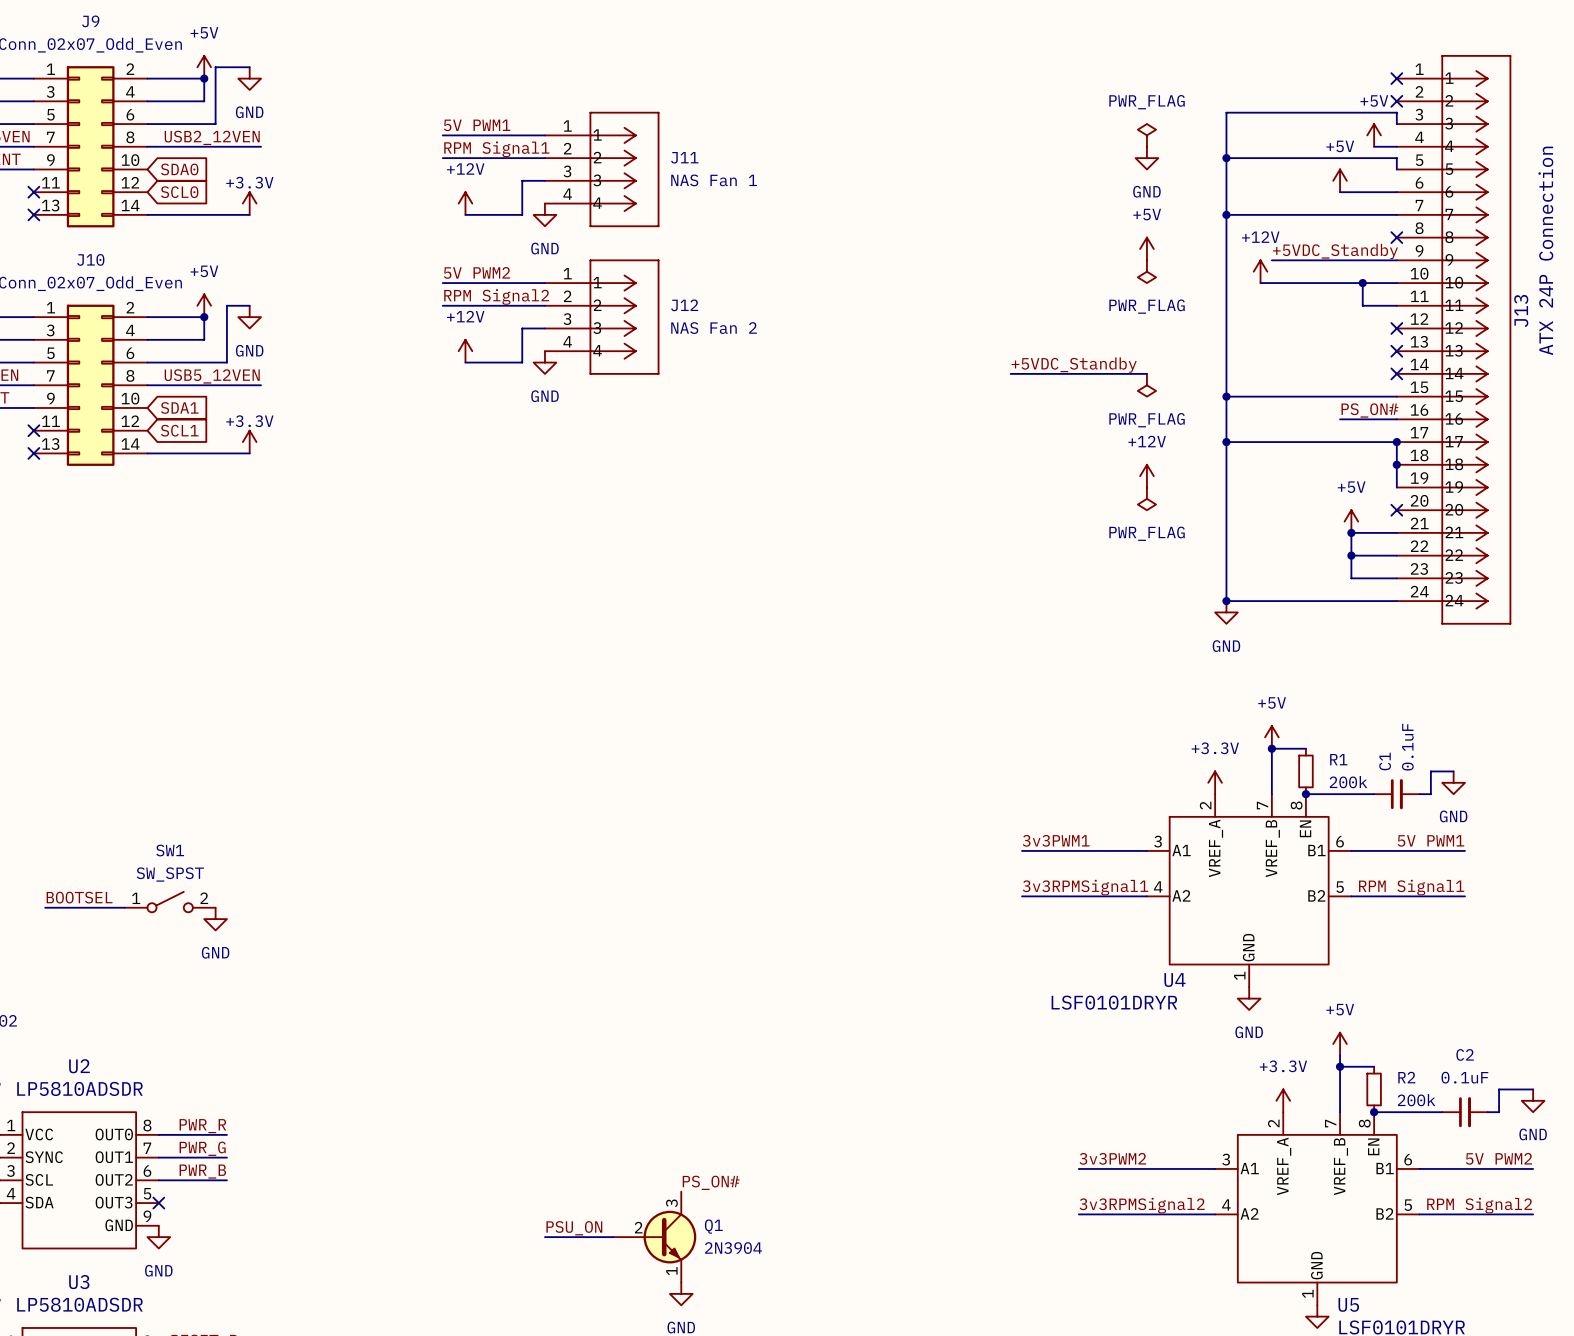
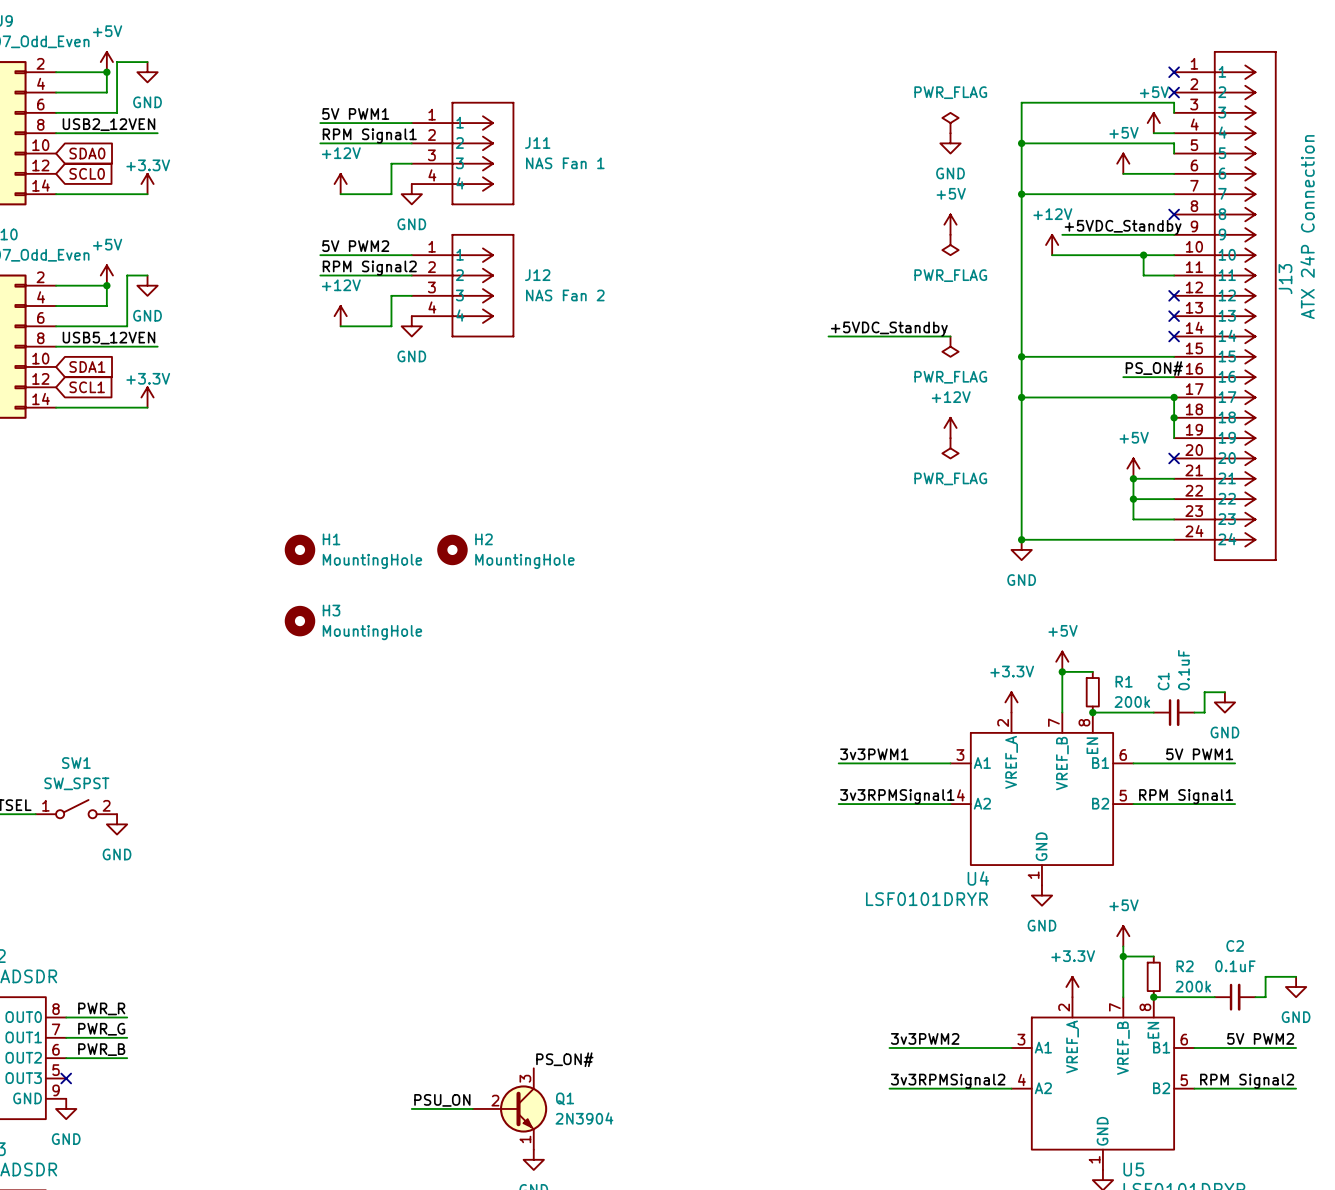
H1: none -> MountingHole (299, 549)
H2: none -> MountingHole (452, 549)
H3: none -> MountingHole (299, 621)

